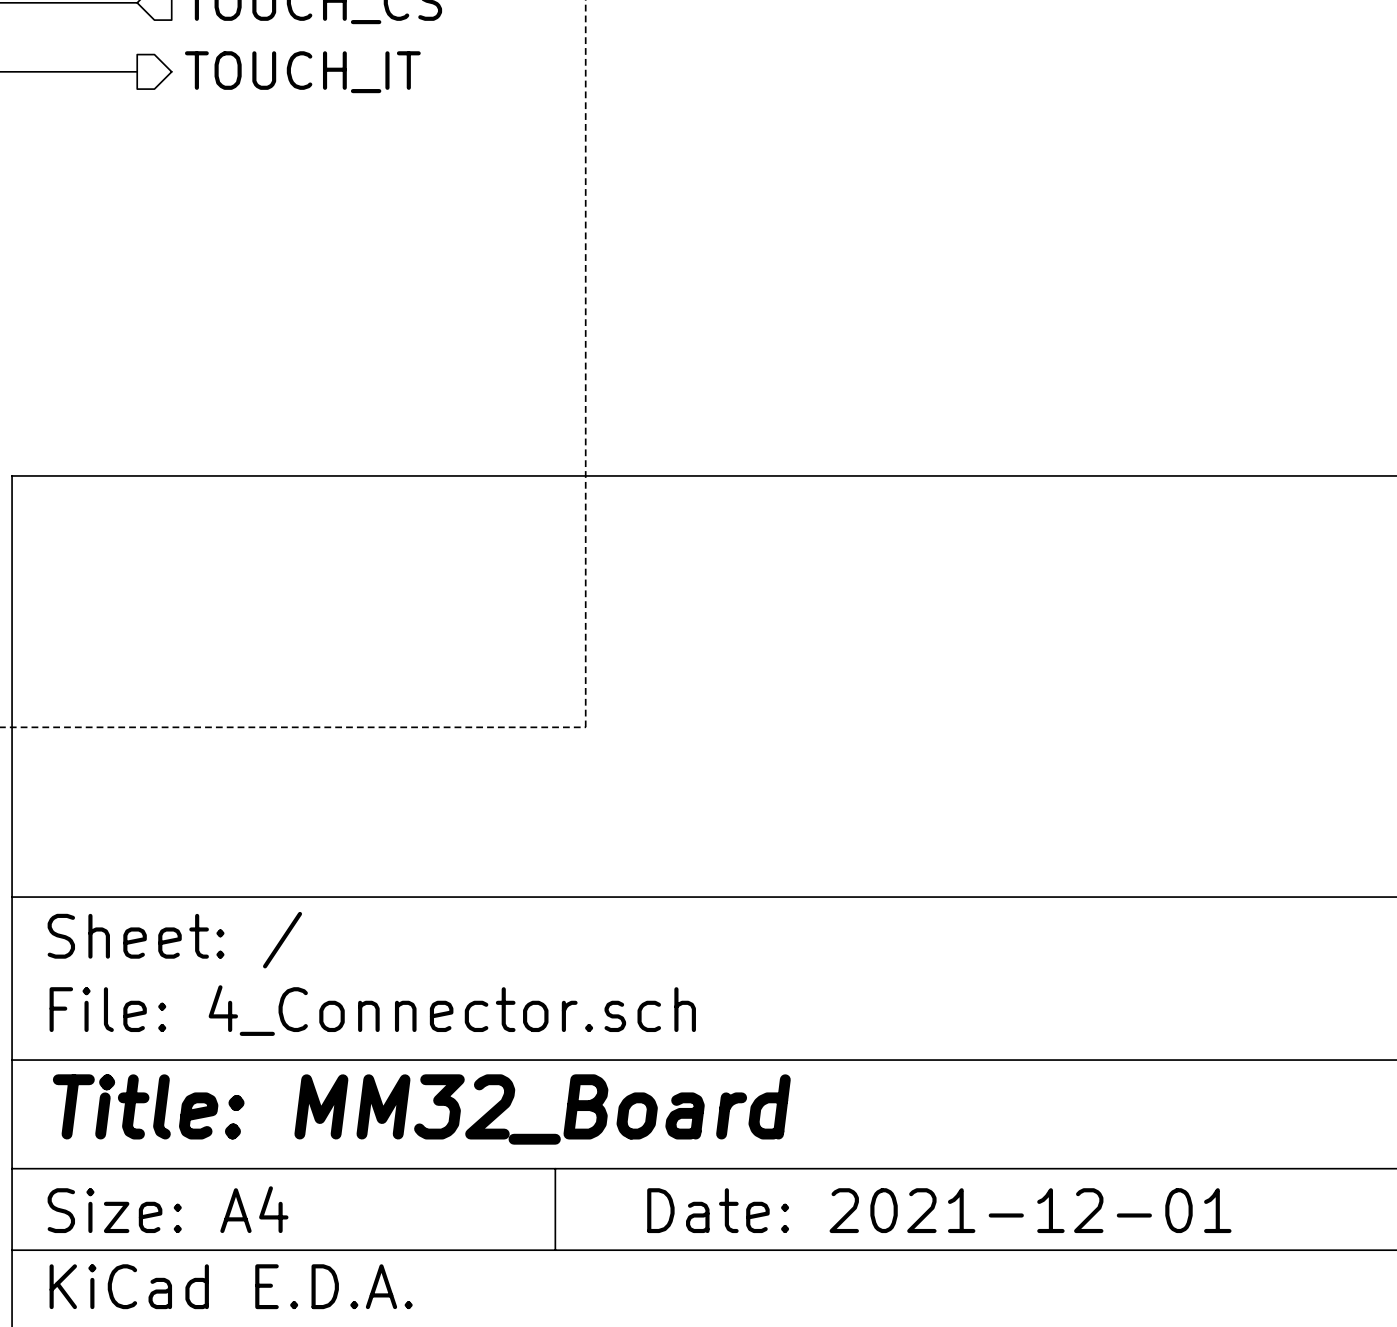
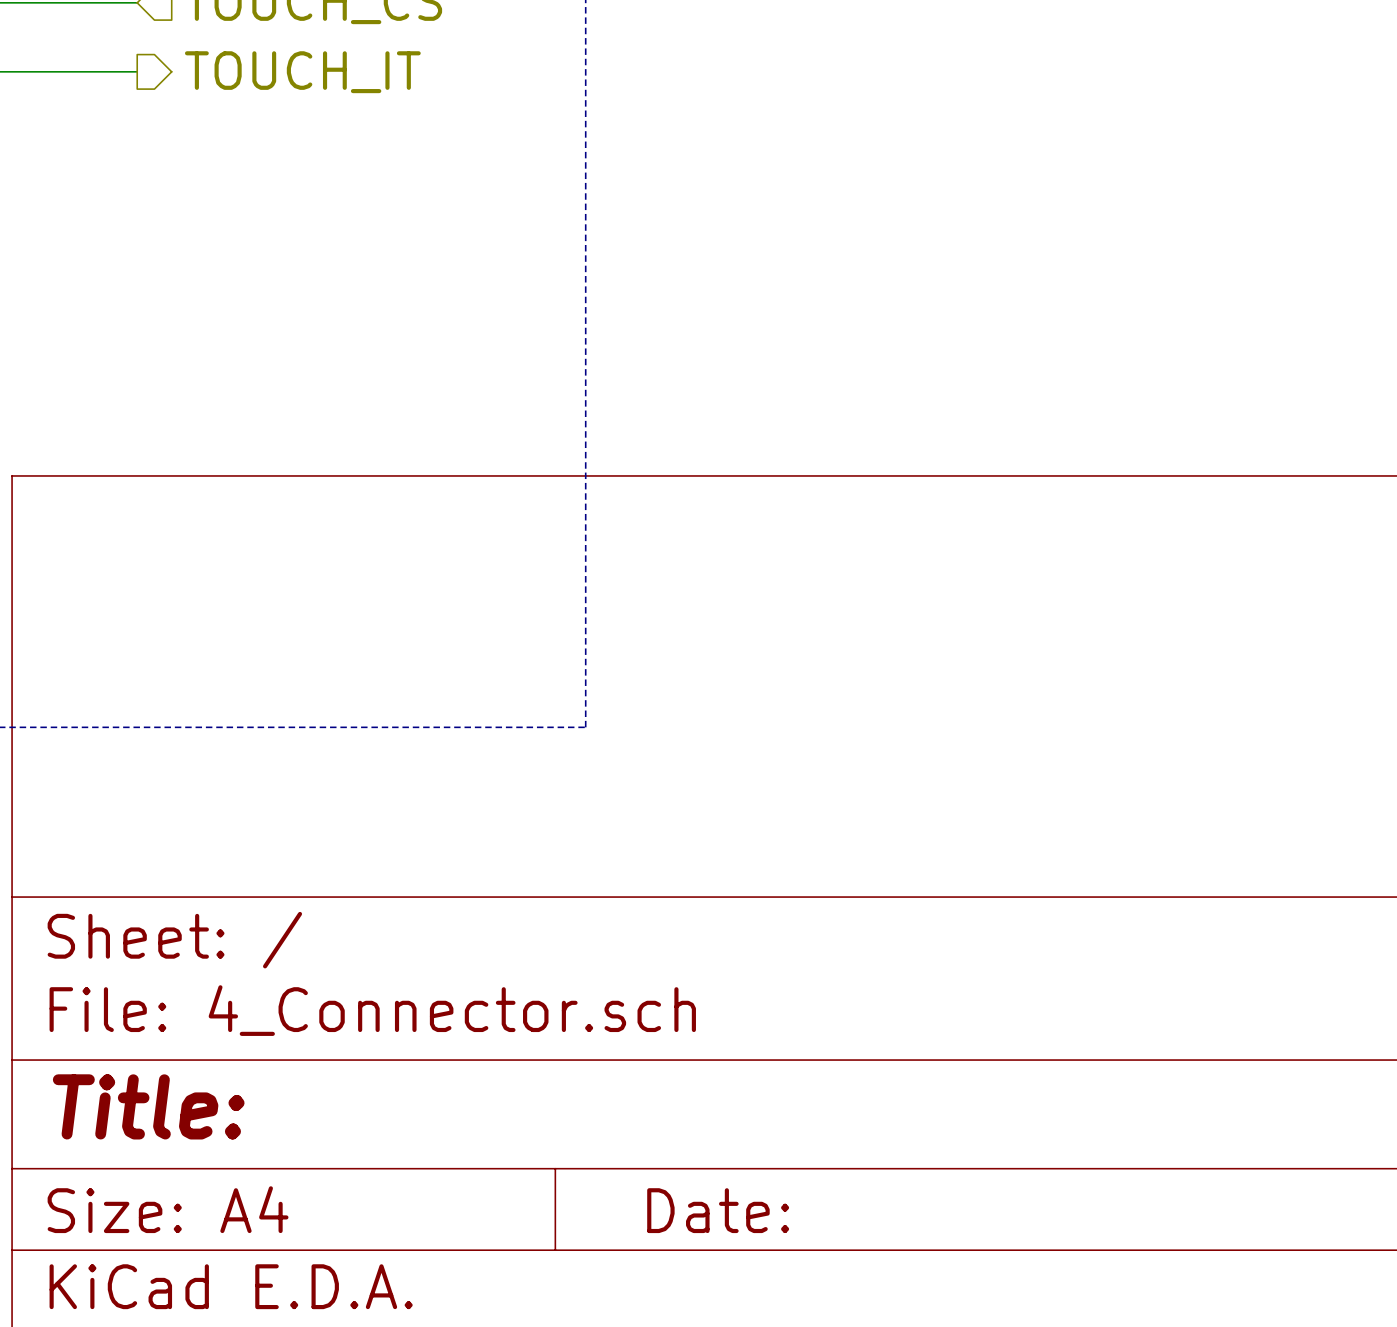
title block: Title: MM32_Board (421, 1109) -> Title: (148, 1106)
title block: Date: 2021-12-01 (939, 1210) -> Date: (718, 1210)

